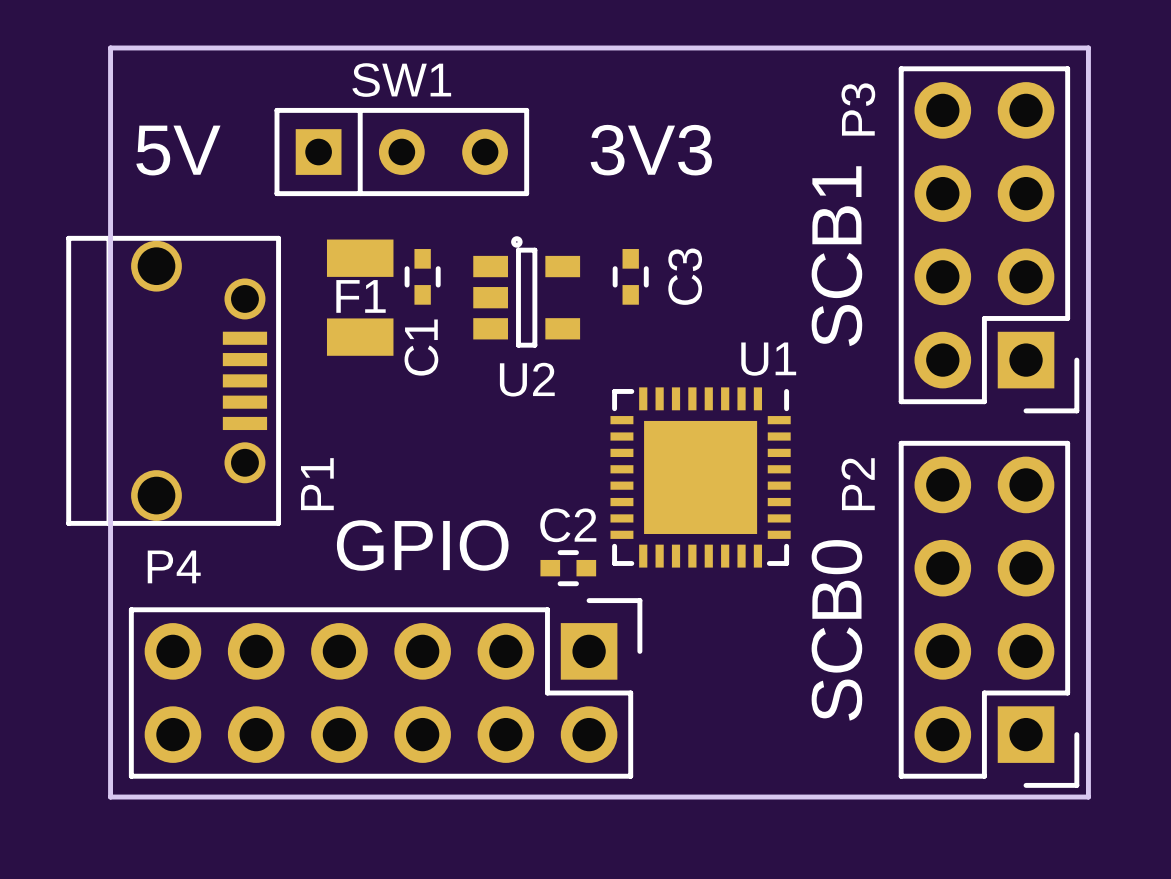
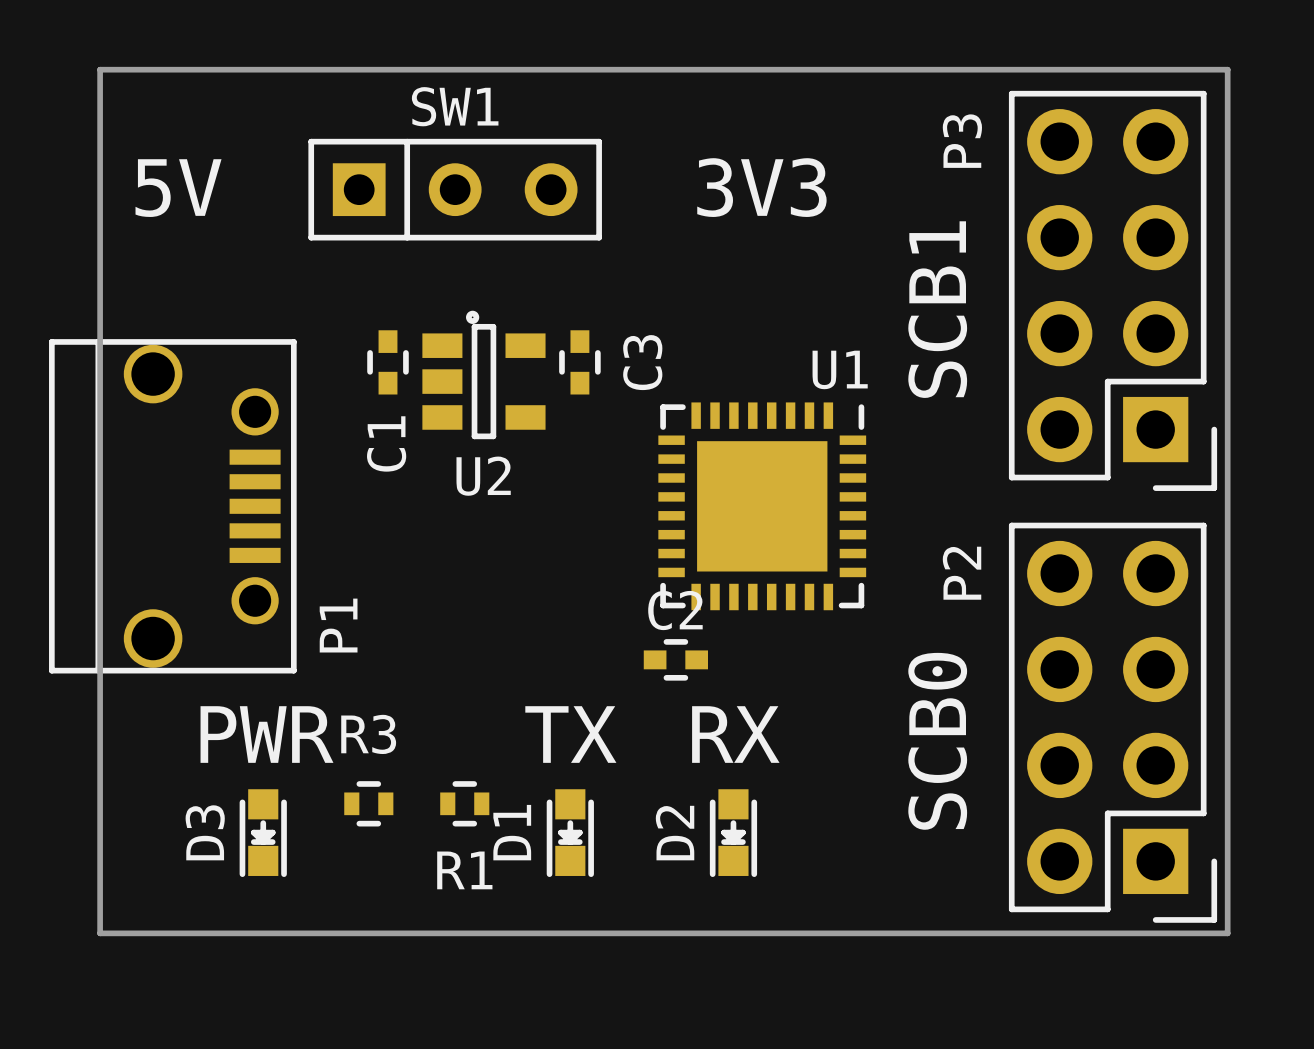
text position: 3V3 (651, 150) -> 3V3 (761, 187)
SW1 position: (401, 152) -> (455, 189)
C1 position: (422, 276) -> (388, 362)
C3 position: (630, 276) -> (579, 362)
U2 position: (526, 291) -> (483, 374)
F1: (360, 297) -> none
P1 position: (173, 380) -> (172, 506)
U1 position: (700, 477) -> (762, 506)
text: GPIO (422, 545) -> none
C2 position: (568, 568) -> (675, 659)
text: none -> PWR (266, 734)
text: none -> TX (570, 734)
text: none -> RX (735, 734)
R3: none -> (368, 803)
R1: none -> (464, 803)
P4: (385, 688) -> none
D3: none -> (263, 833)
D1: none -> (570, 833)
D2: none -> (733, 833)

